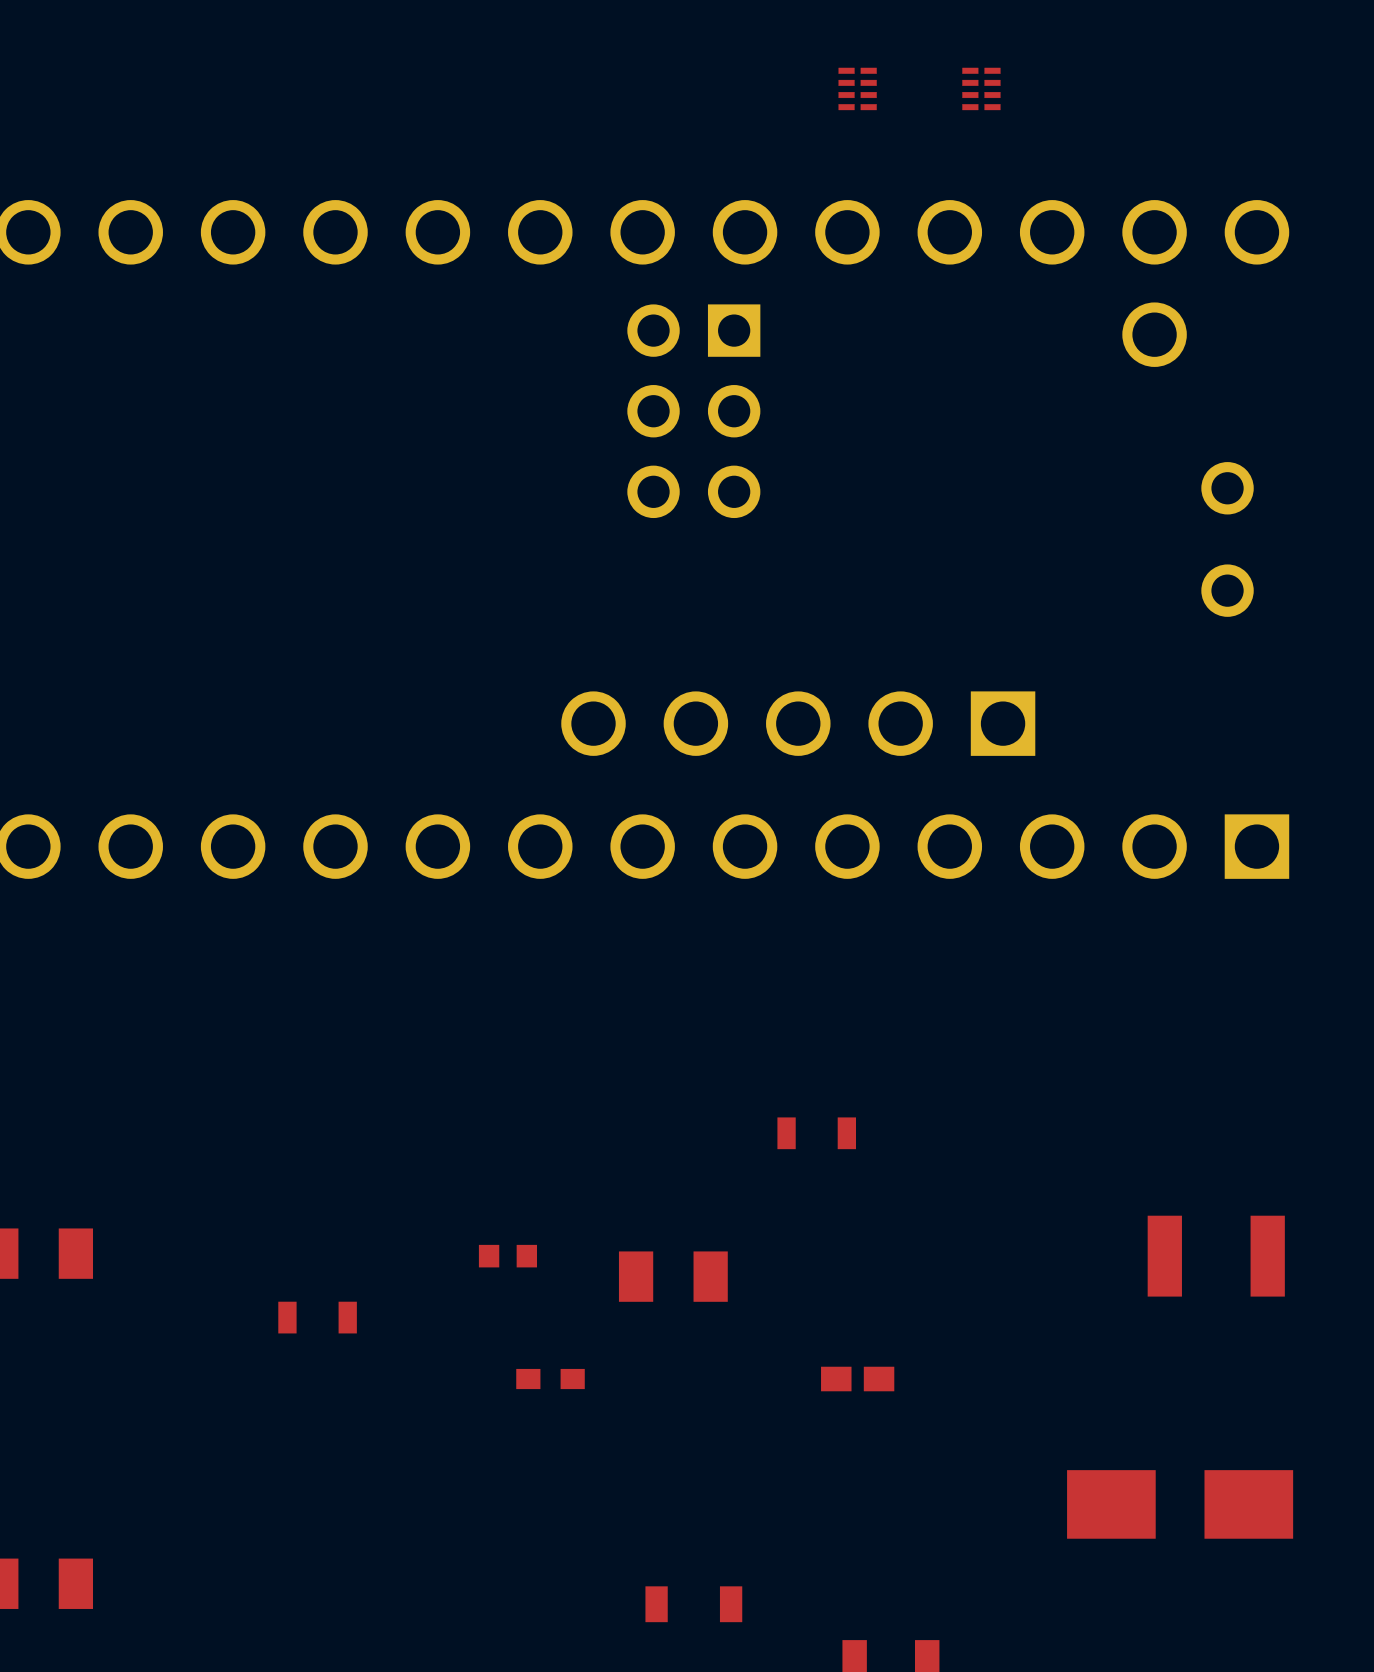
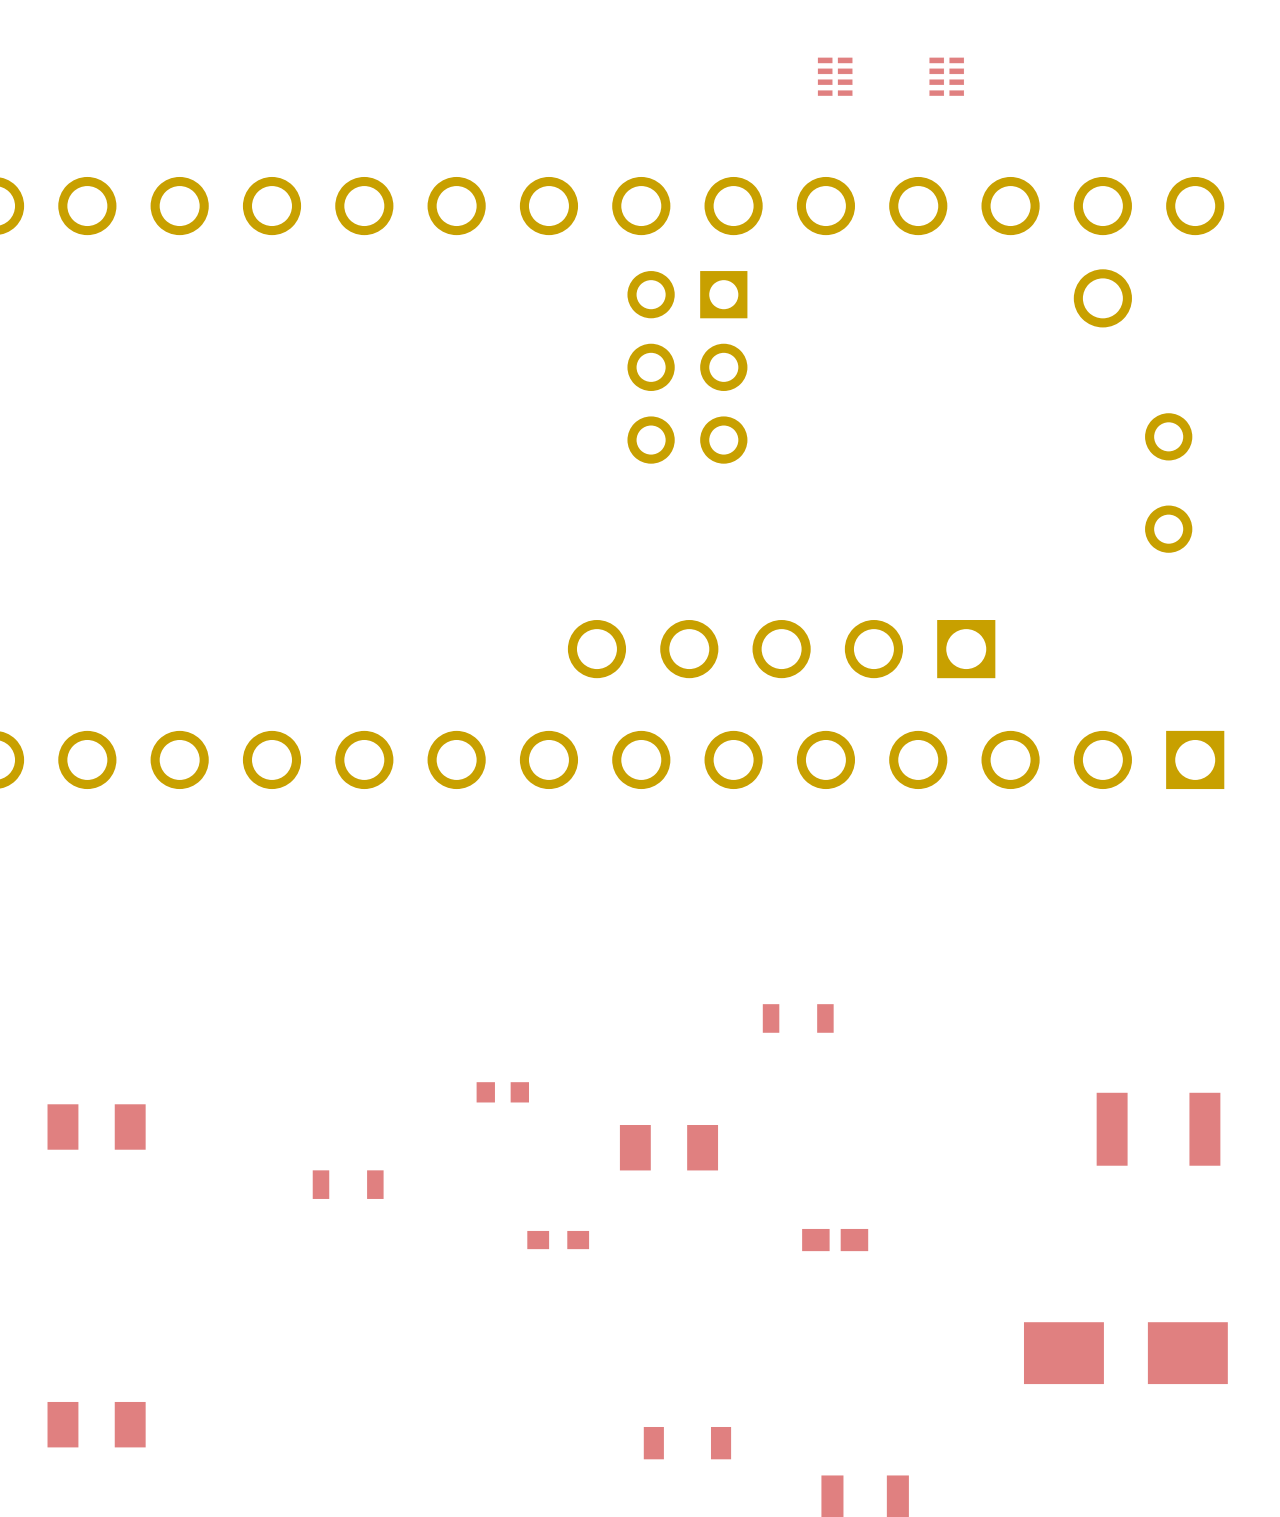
part position: (507, 1256) -> (502, 1092)

